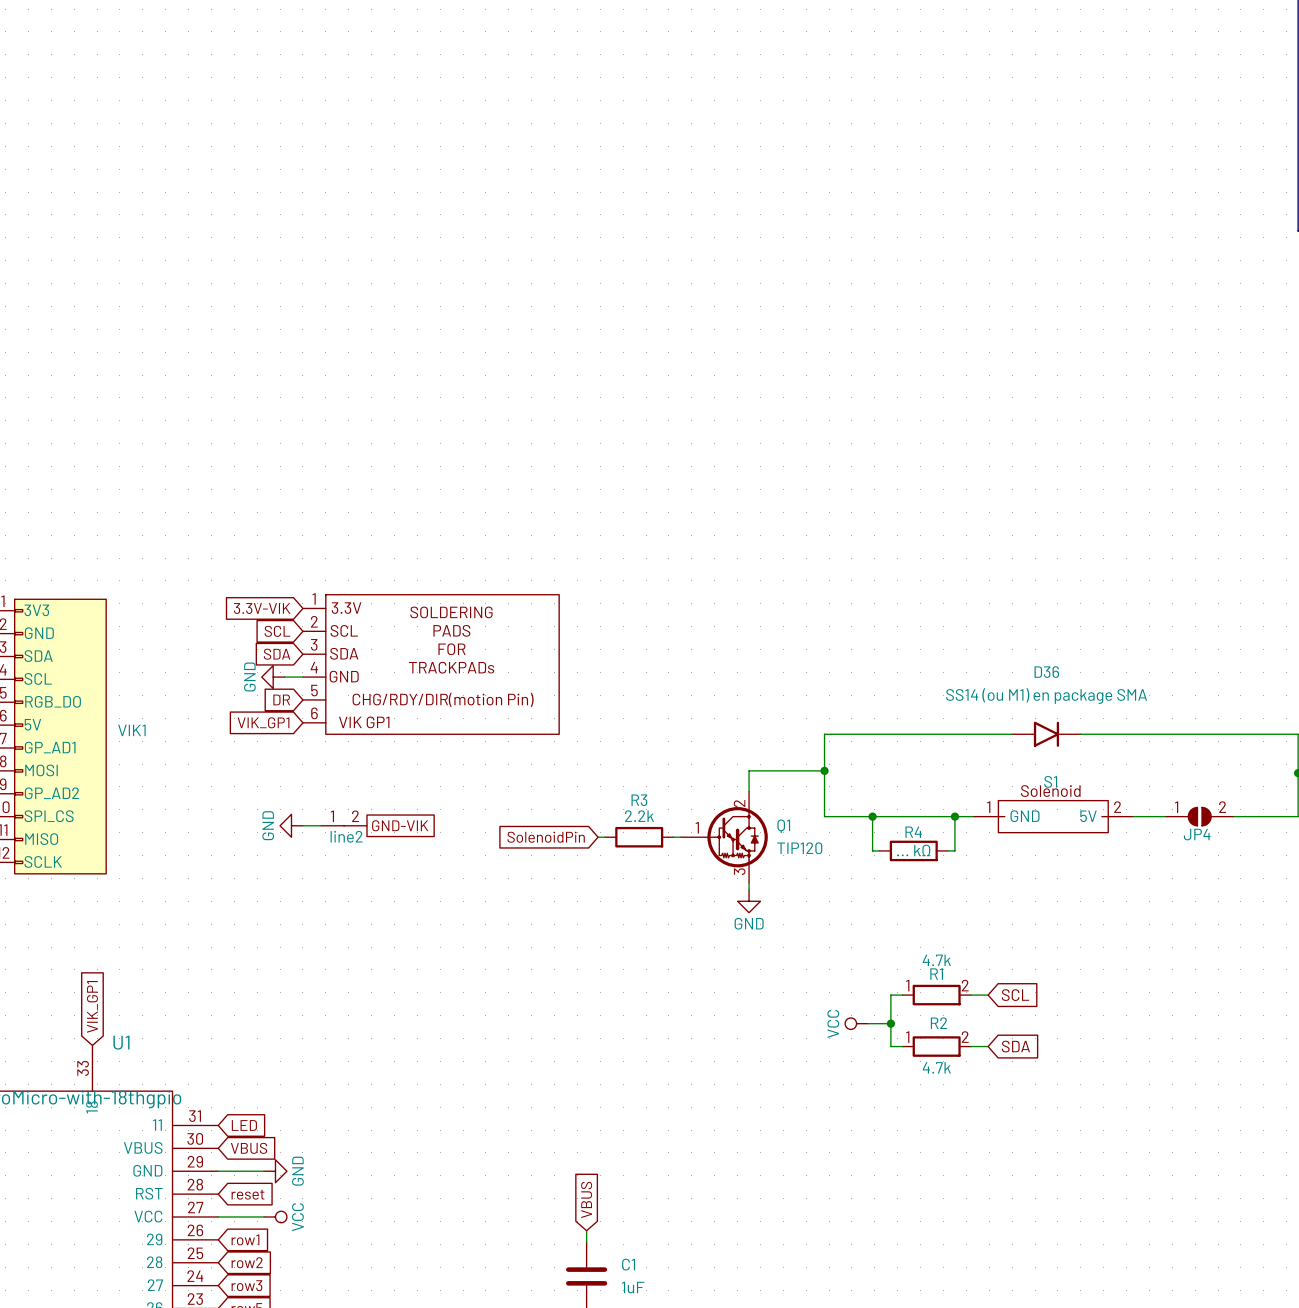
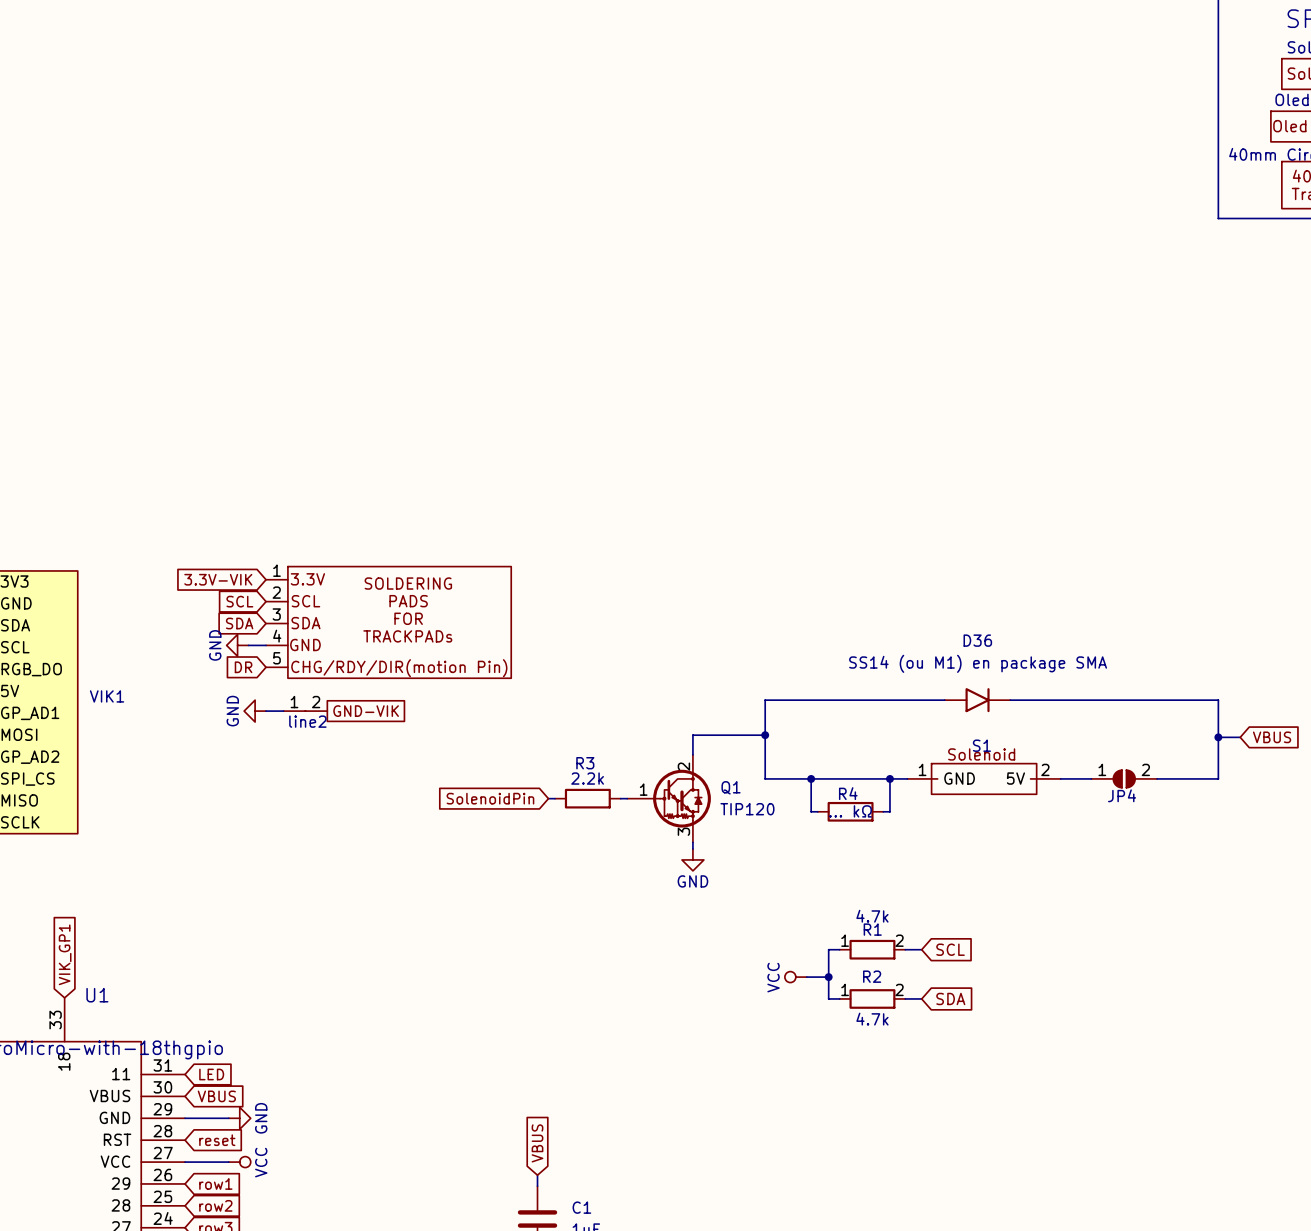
part: none -> (388, 622)
part: (431, 664) -> none
global label: VIK_GP1 (263, 722) -> none
power symbol position: GND (291, 825) -> GND (255, 711)
wire: (302, 825) (321, 825) -> (266, 711) (283, 711)
line2 position: (344, 825) -> (305, 711)
global label position: GND-VIK (400, 825) -> GND-VIK (366, 711)

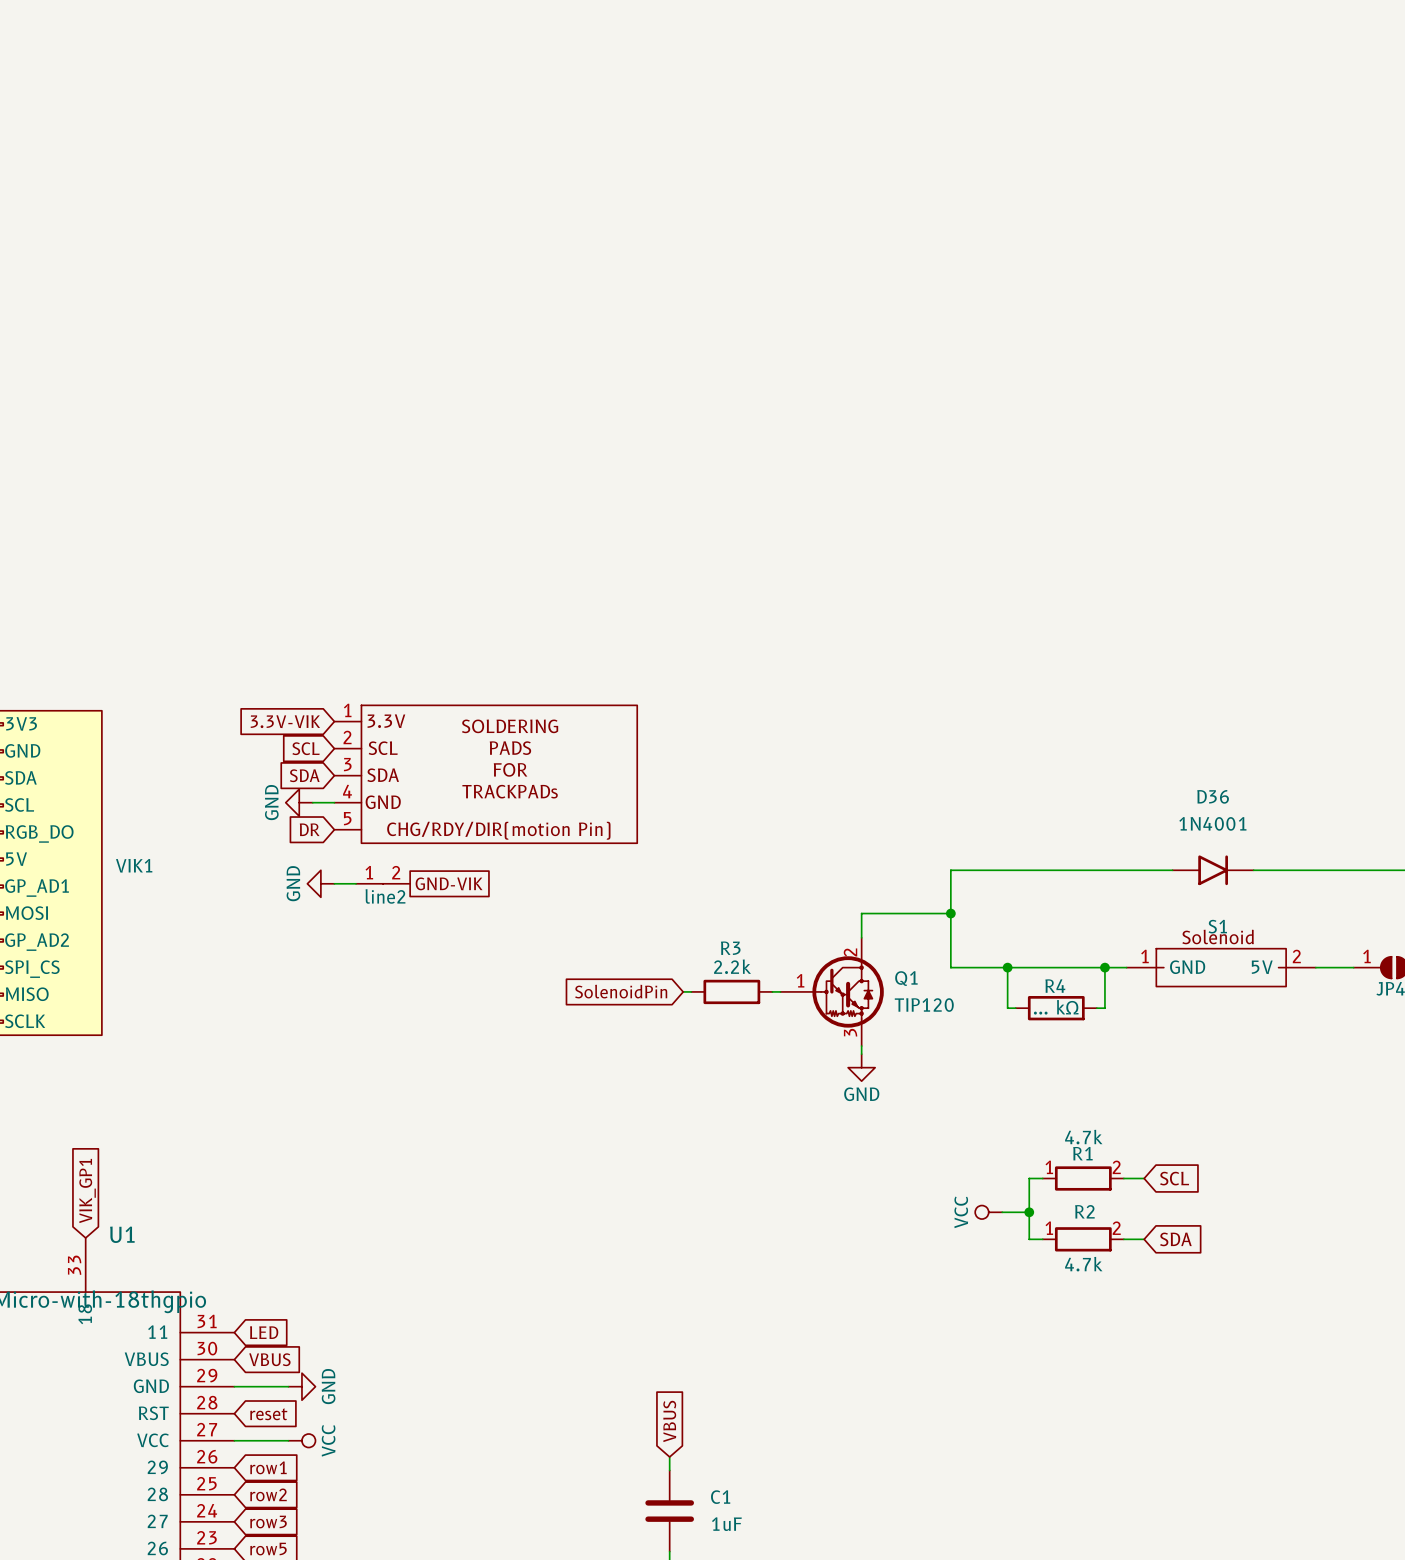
D36 value: SS14 (ou M1) en package SMA (978, 663) -> 1N4001 (1212, 823)

